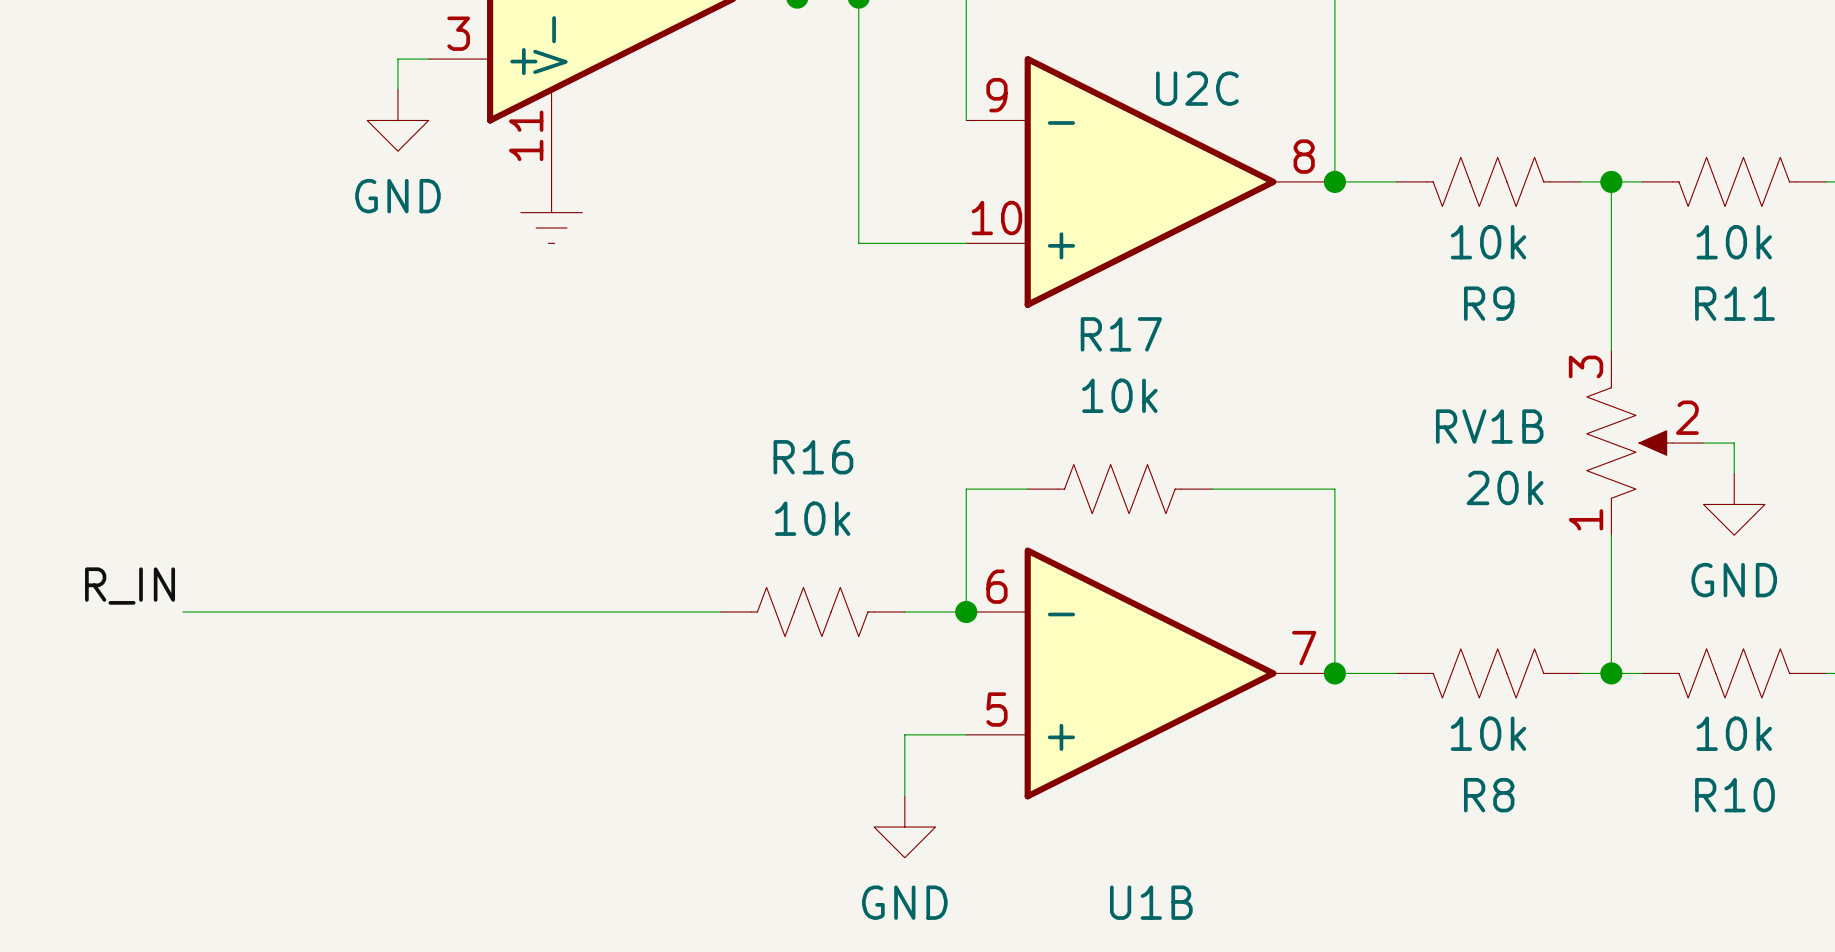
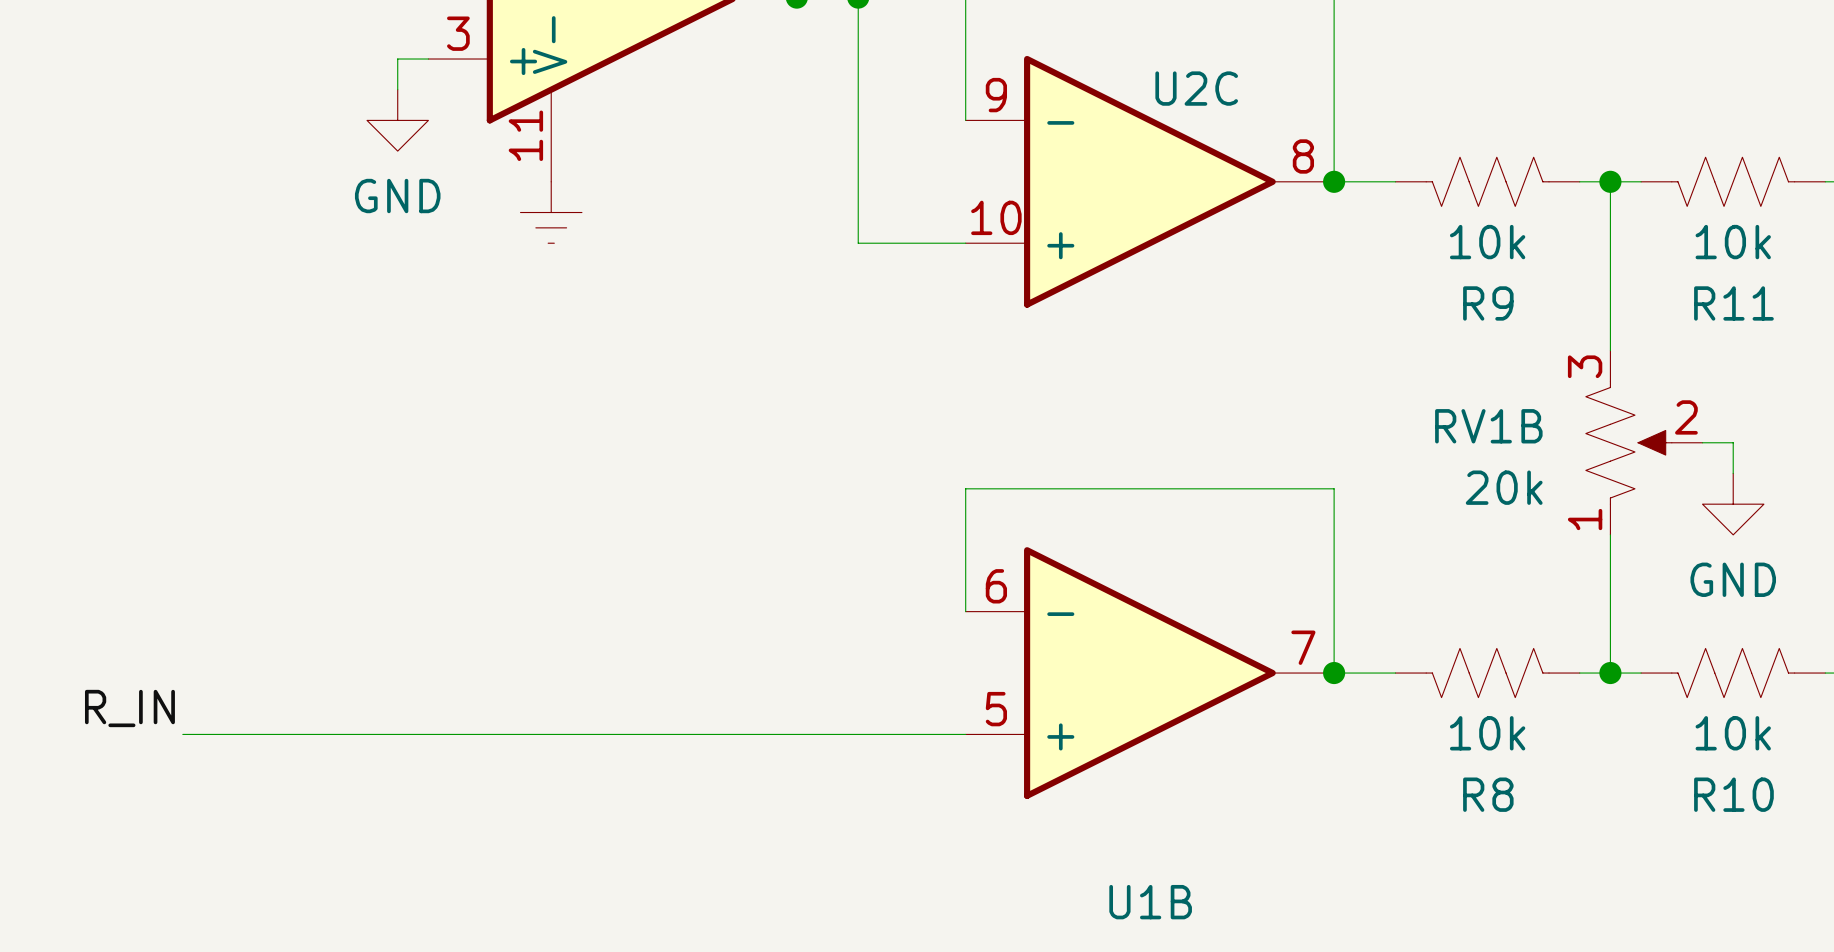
wire: none -> (1027, 488) (1211, 488)
R17: 10k (1119, 489) -> none
label position: R_IN (130, 586) -> R_IN (129, 708)
wire: (182, 611) (720, 611) -> none
R16: 10k (812, 611) -> none
wire: (904, 611) (966, 611) -> none
junction: (966, 611) -> none
wire: (904, 734) (904, 796) -> (904, 734) (182, 734)
power symbol: GND (904, 827) -> none

